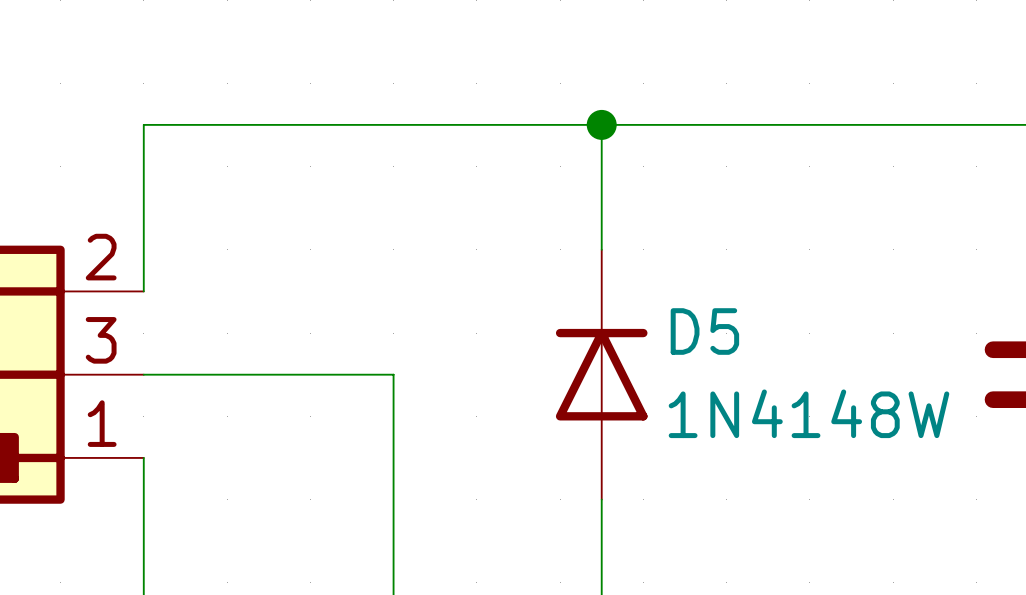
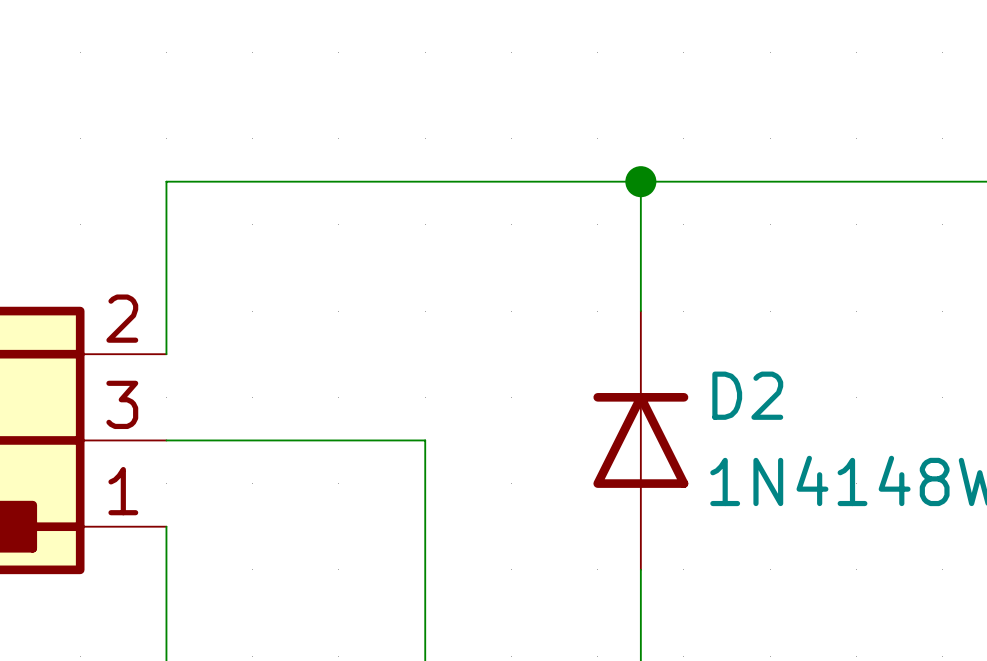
D5 name: D5 (704, 331) -> D2 (747, 395)

